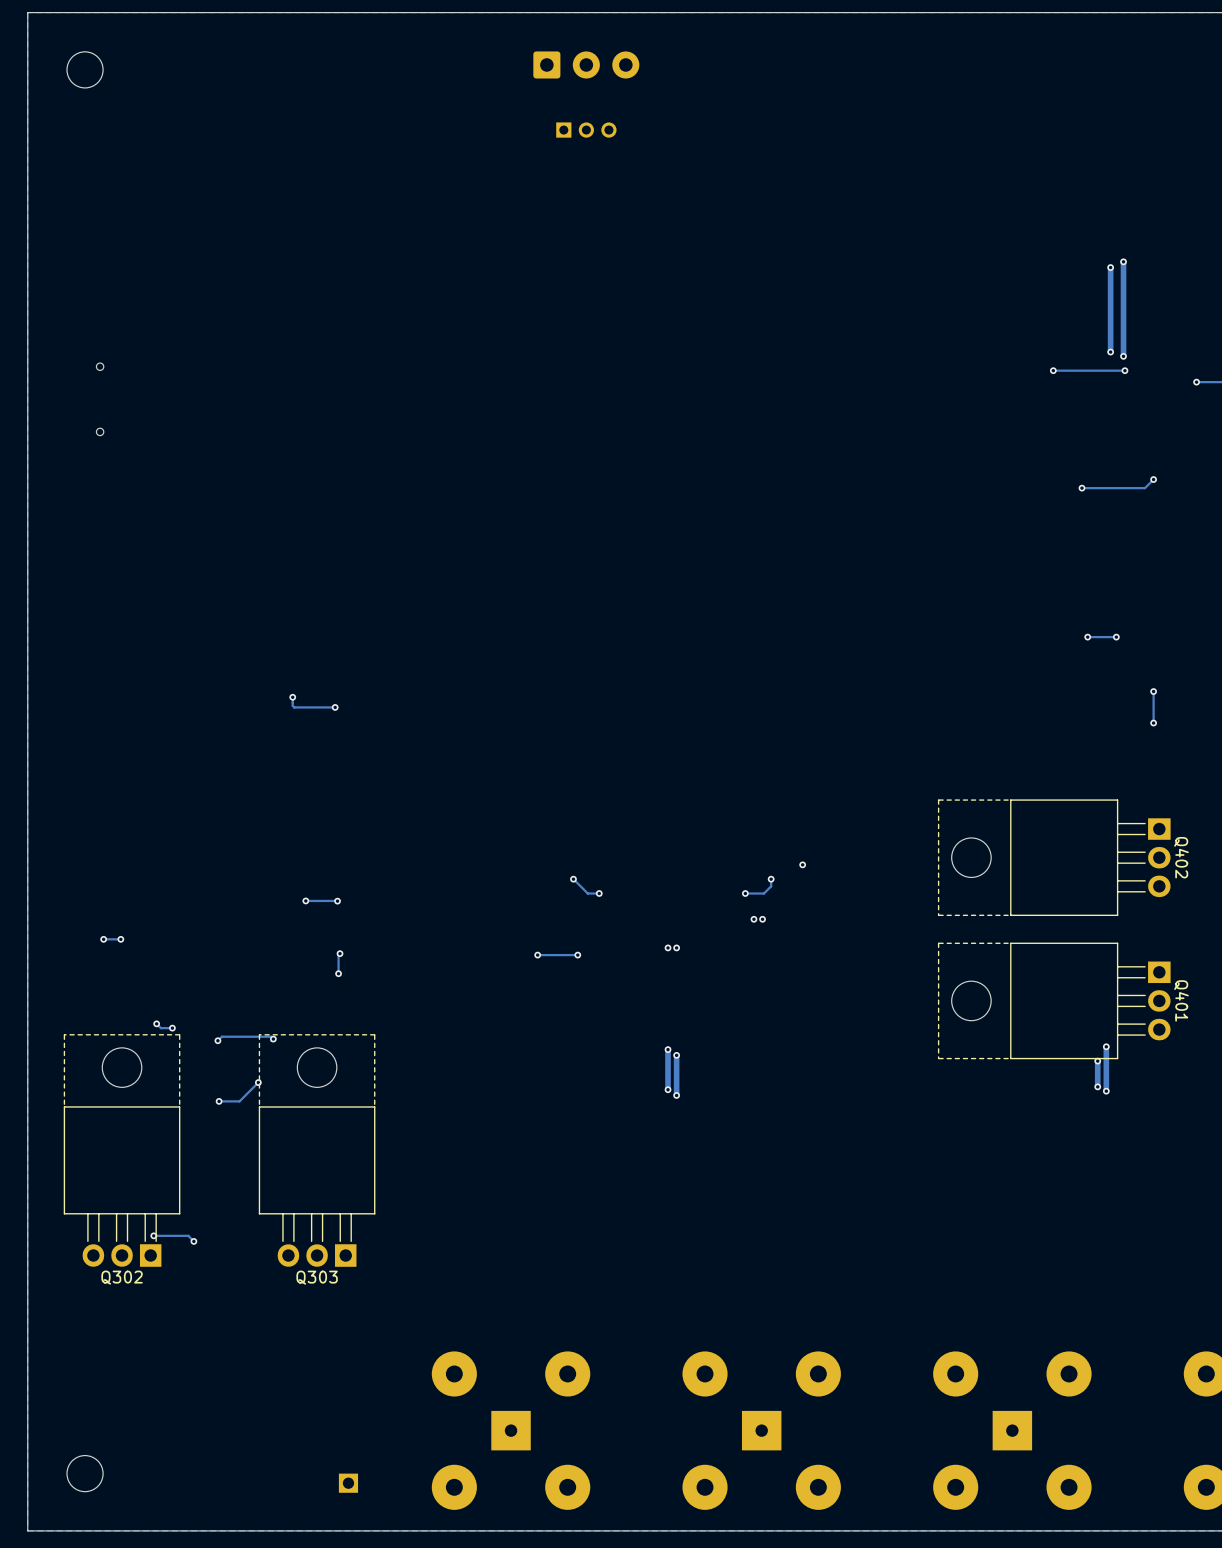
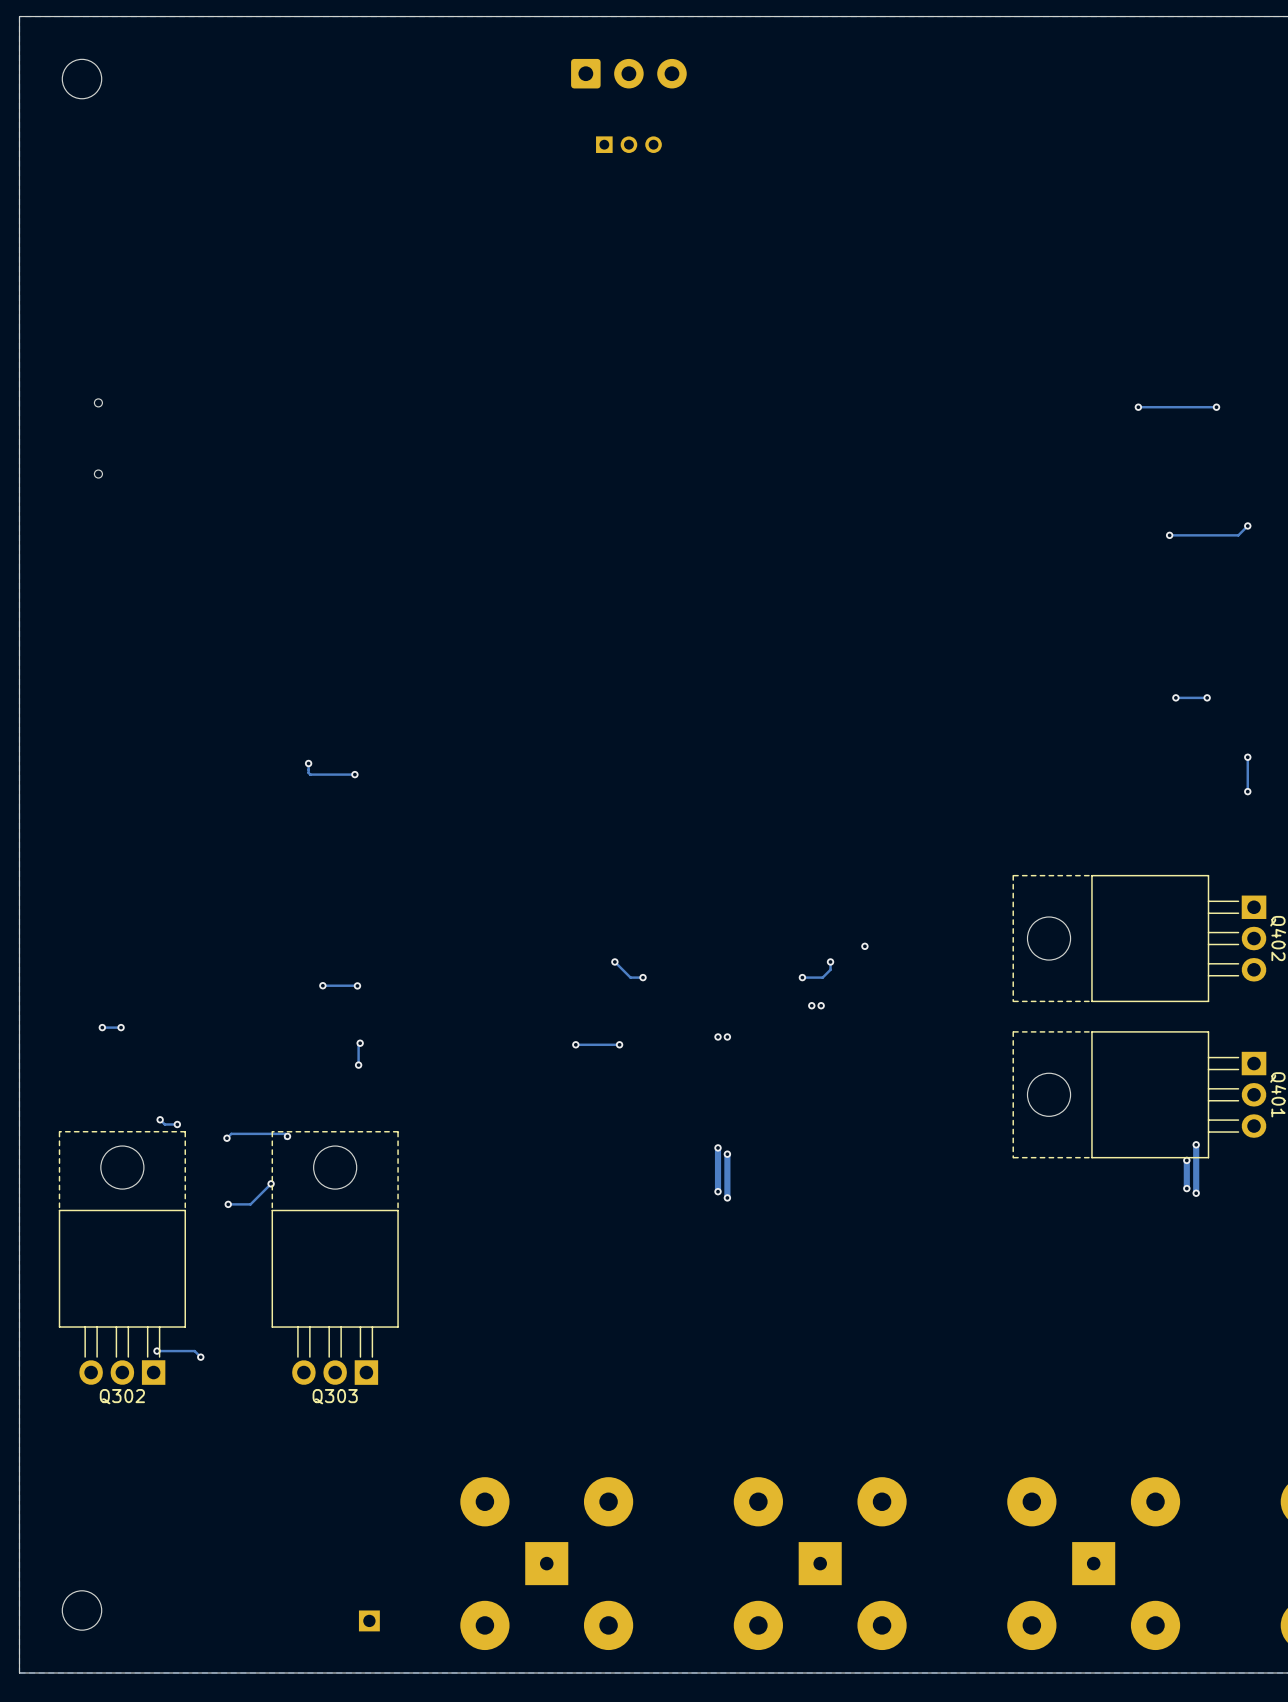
track: (1123, 261) (1123, 356) -> none
via: (1123, 261) -> none
track: (1110, 267) (1110, 352) -> none
via: (1110, 267) -> none
via: (1110, 352) -> none
via: (1123, 356) -> none

